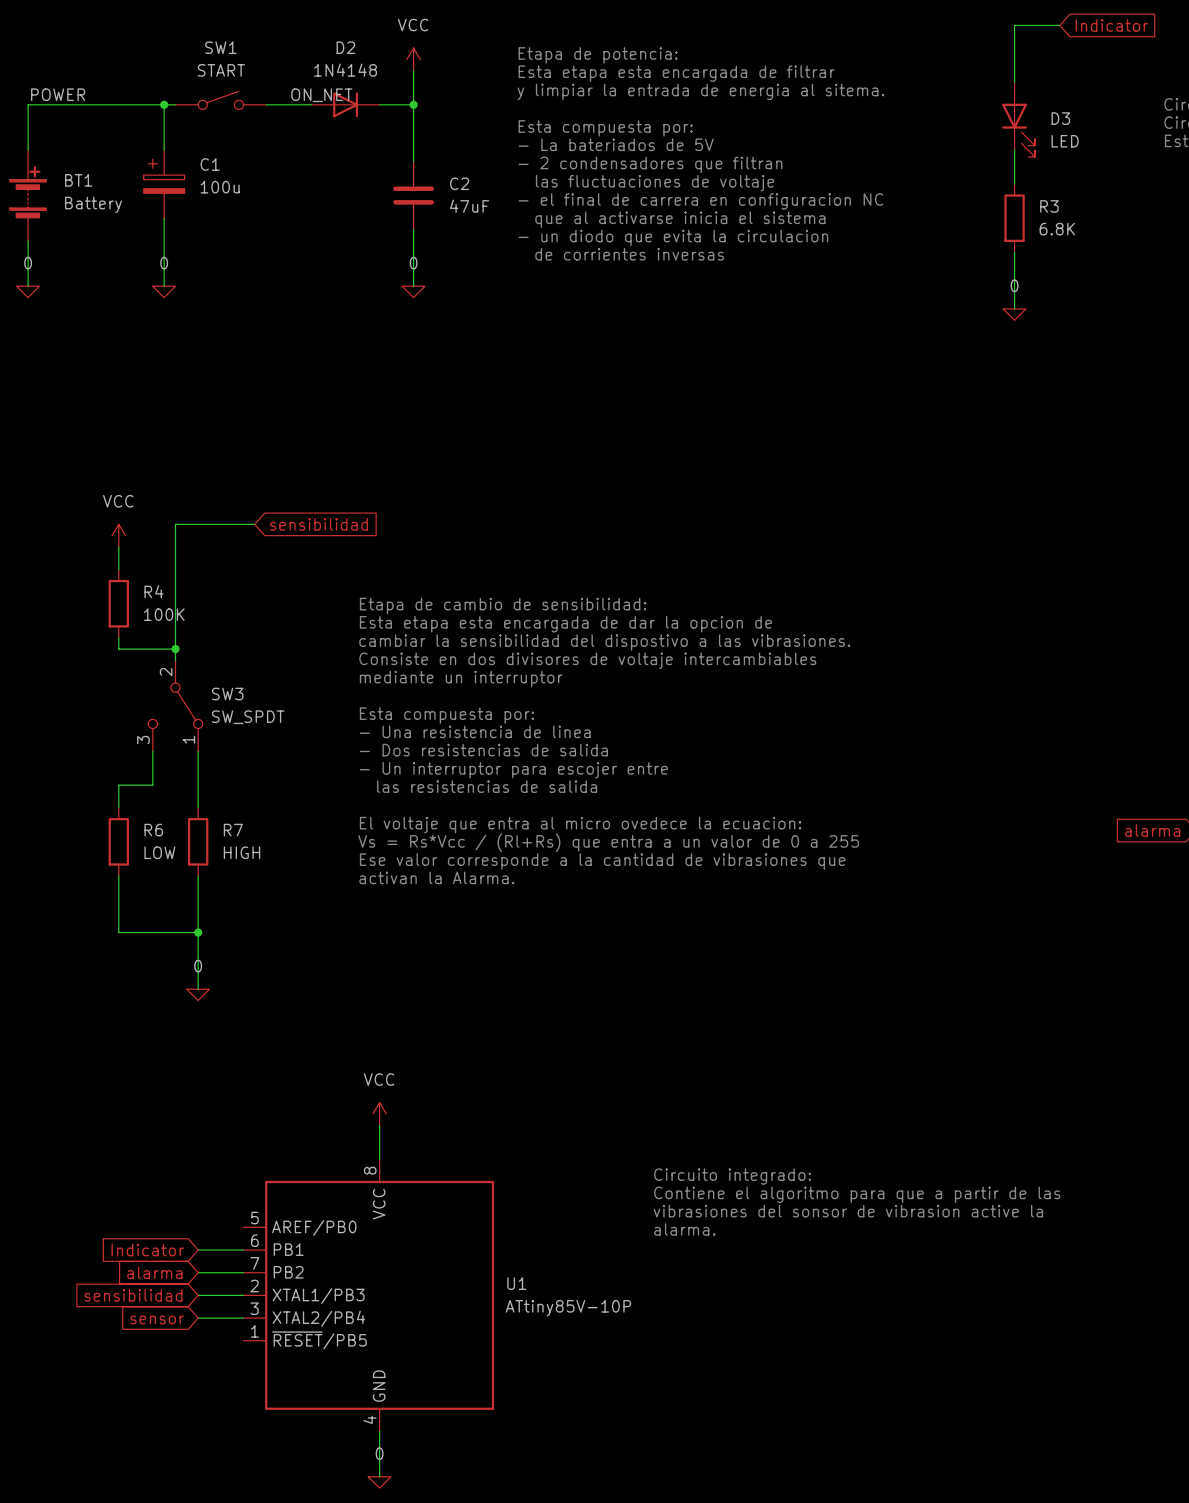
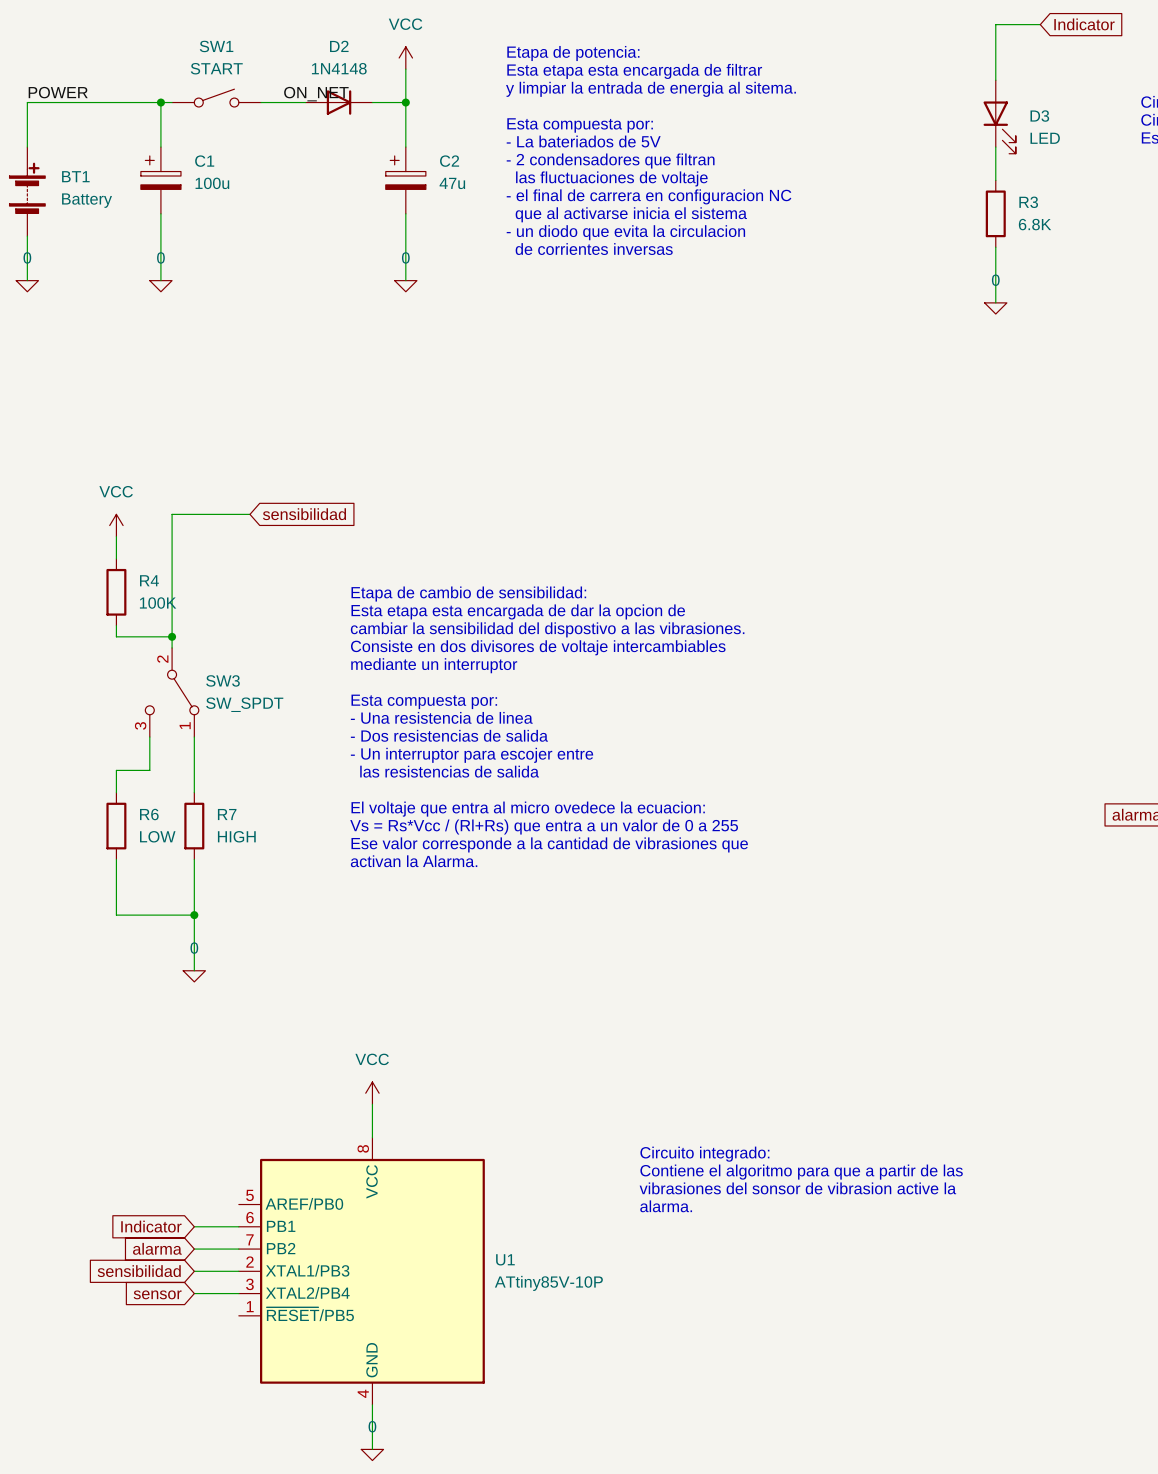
C2 symbol: [393, 161, 435, 230] -> [385, 147, 426, 214]
C2 value: 47uF (469, 206) -> 47u (452, 183)

